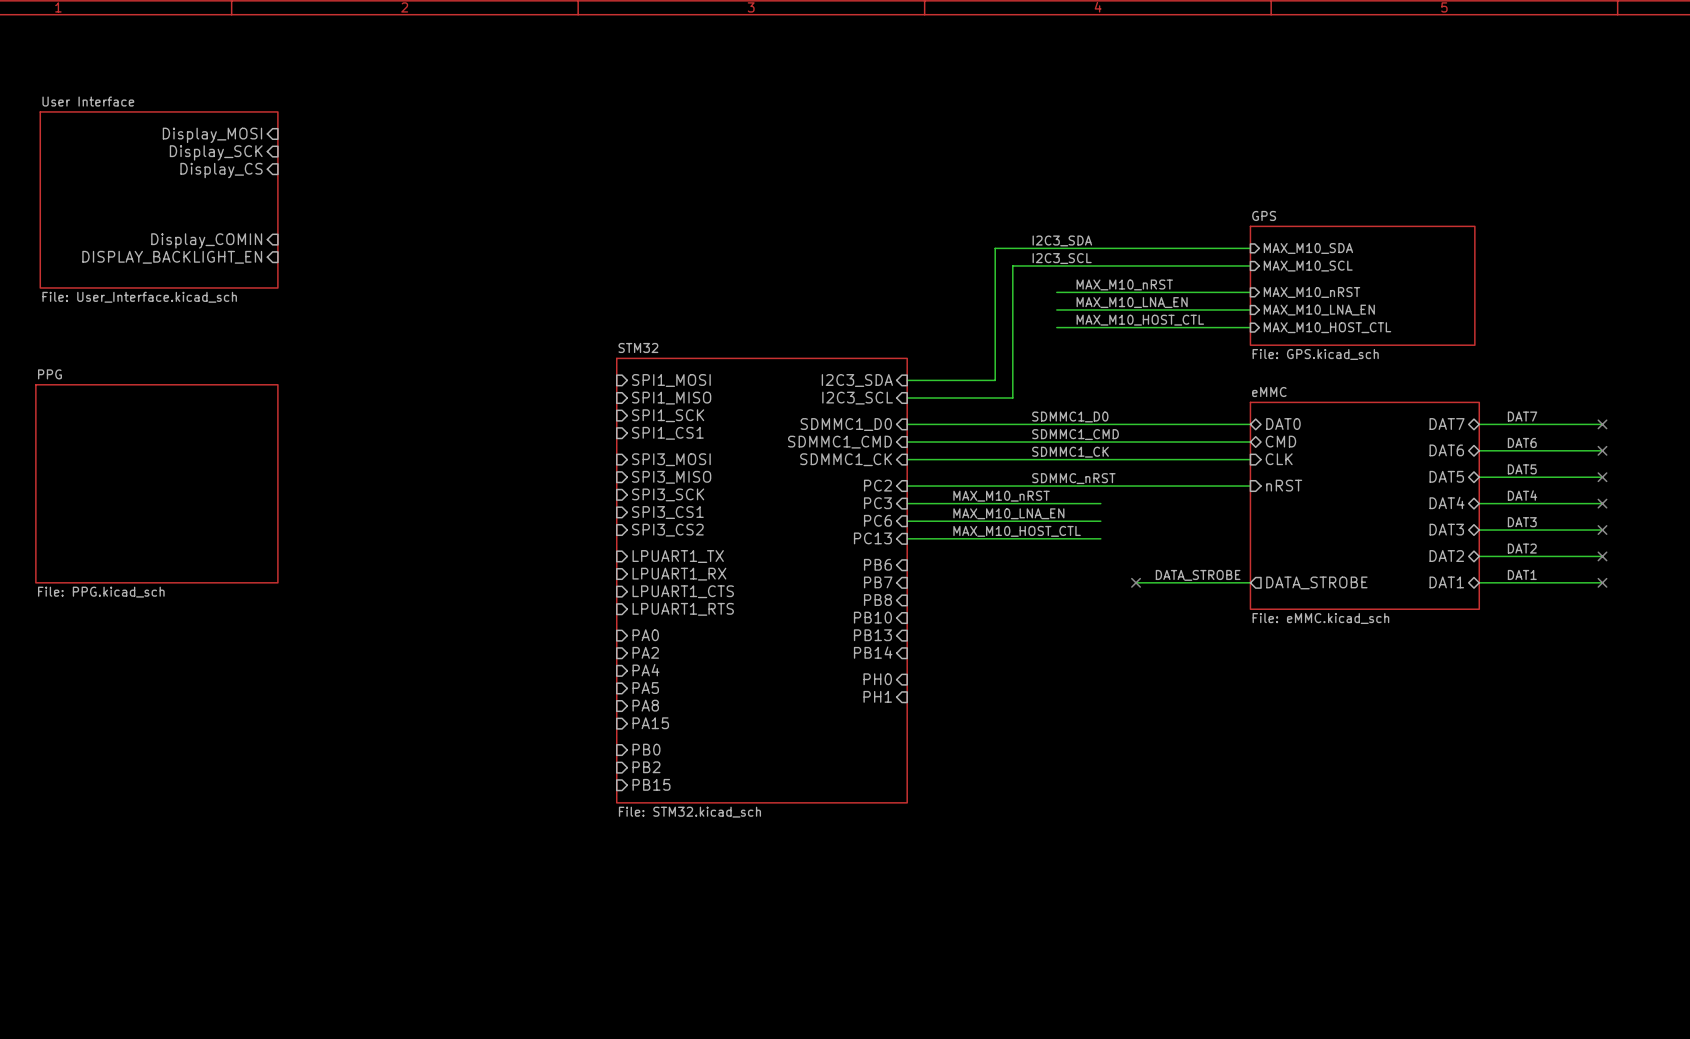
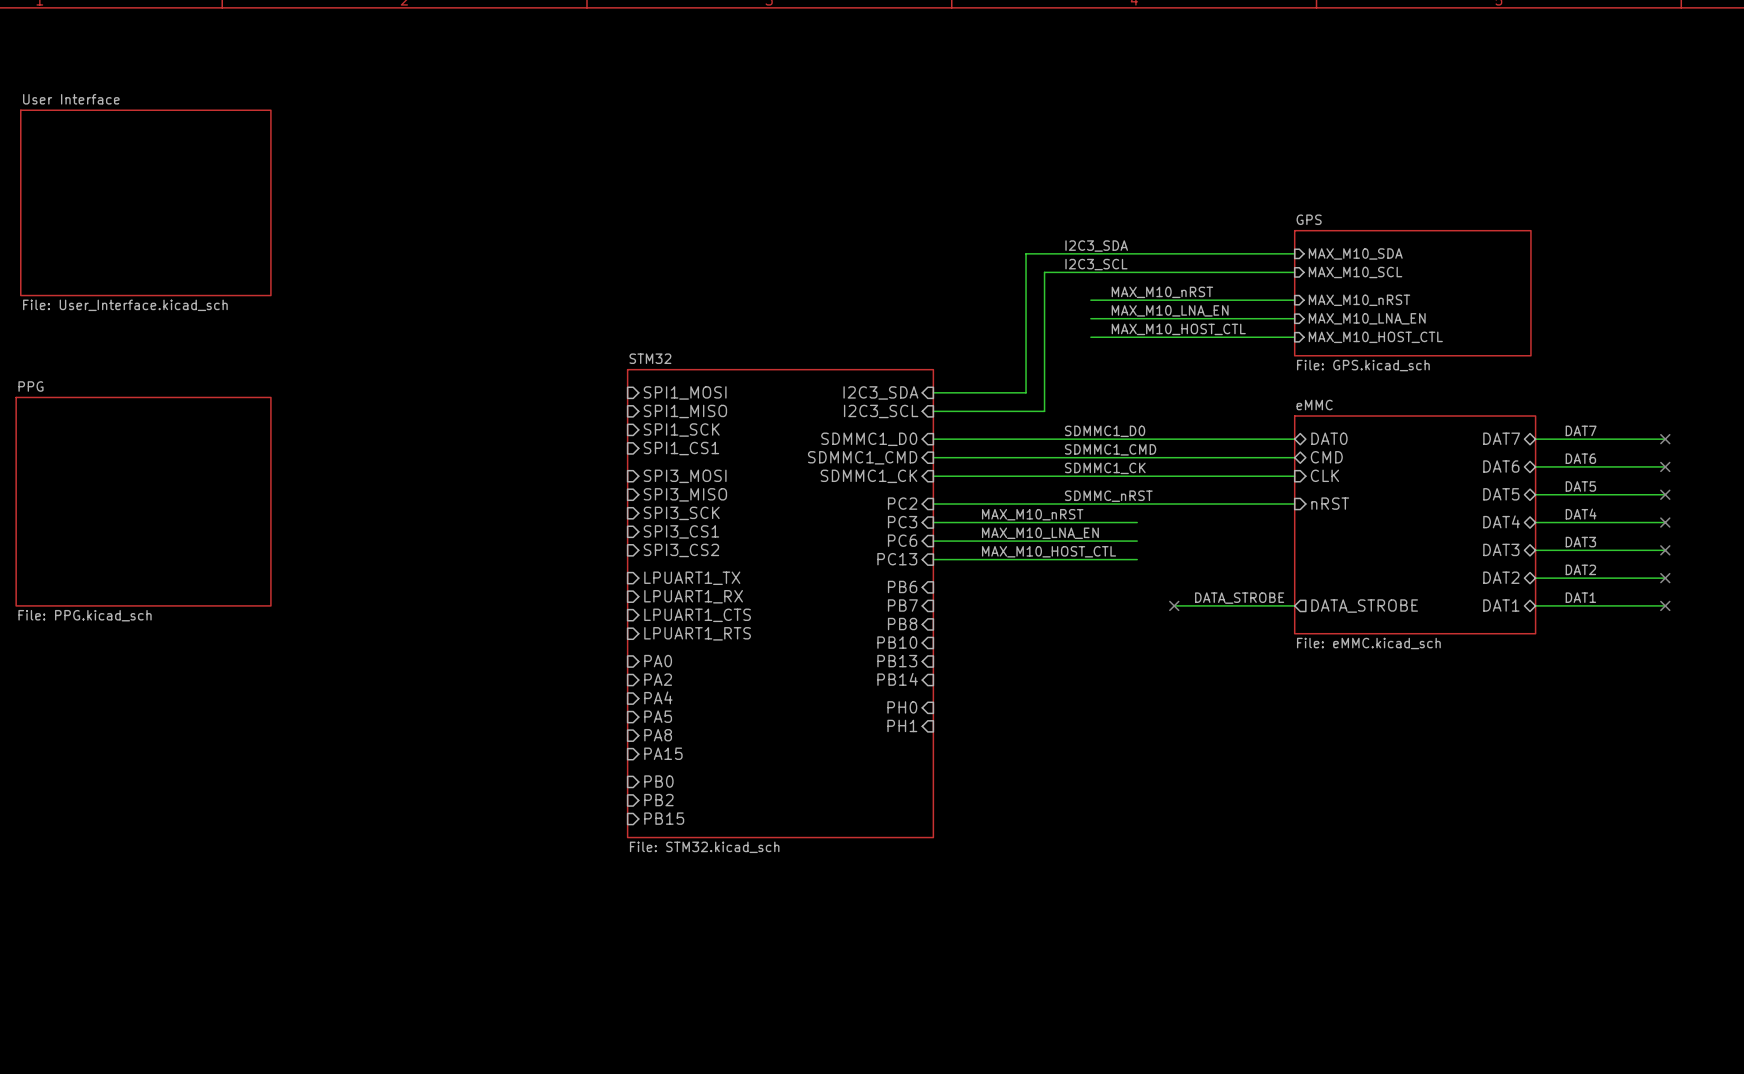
sheet pin: Display_MOSI (212, 135) -> none
sheet pin: Display_SCK (216, 152) -> none
sheet pin: Display_CS (221, 170) -> none
sheet pin: Display_COMIN (206, 240) -> none
sheet pin: DISPLAY_BACKLIGHT_EN (172, 257) -> none

